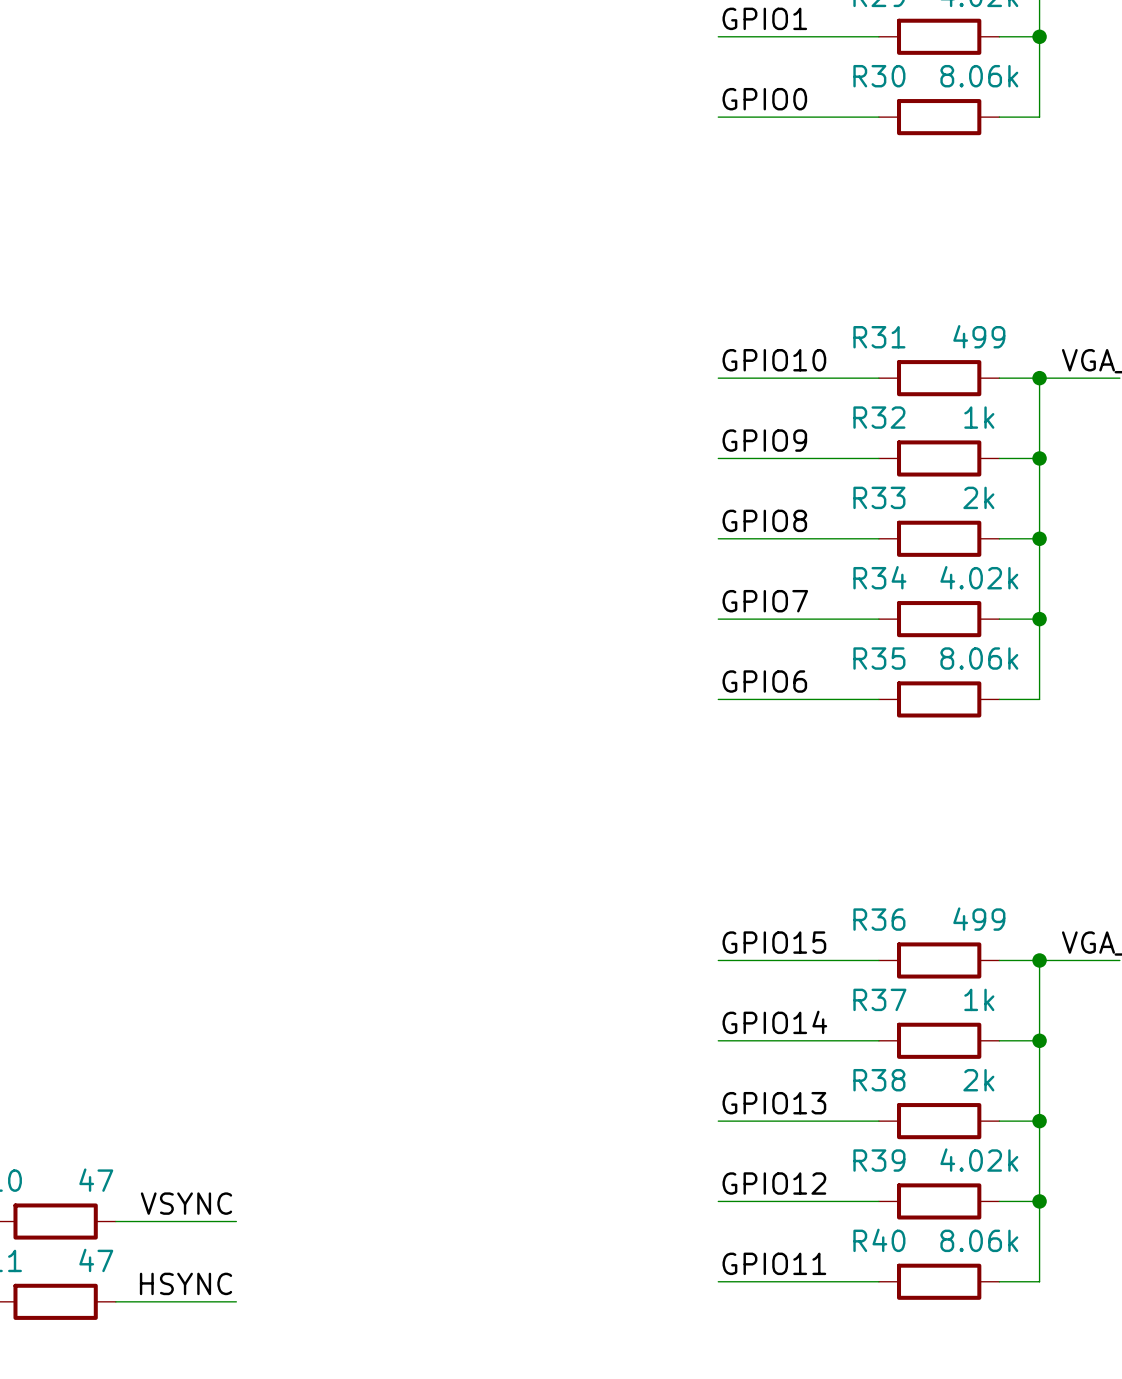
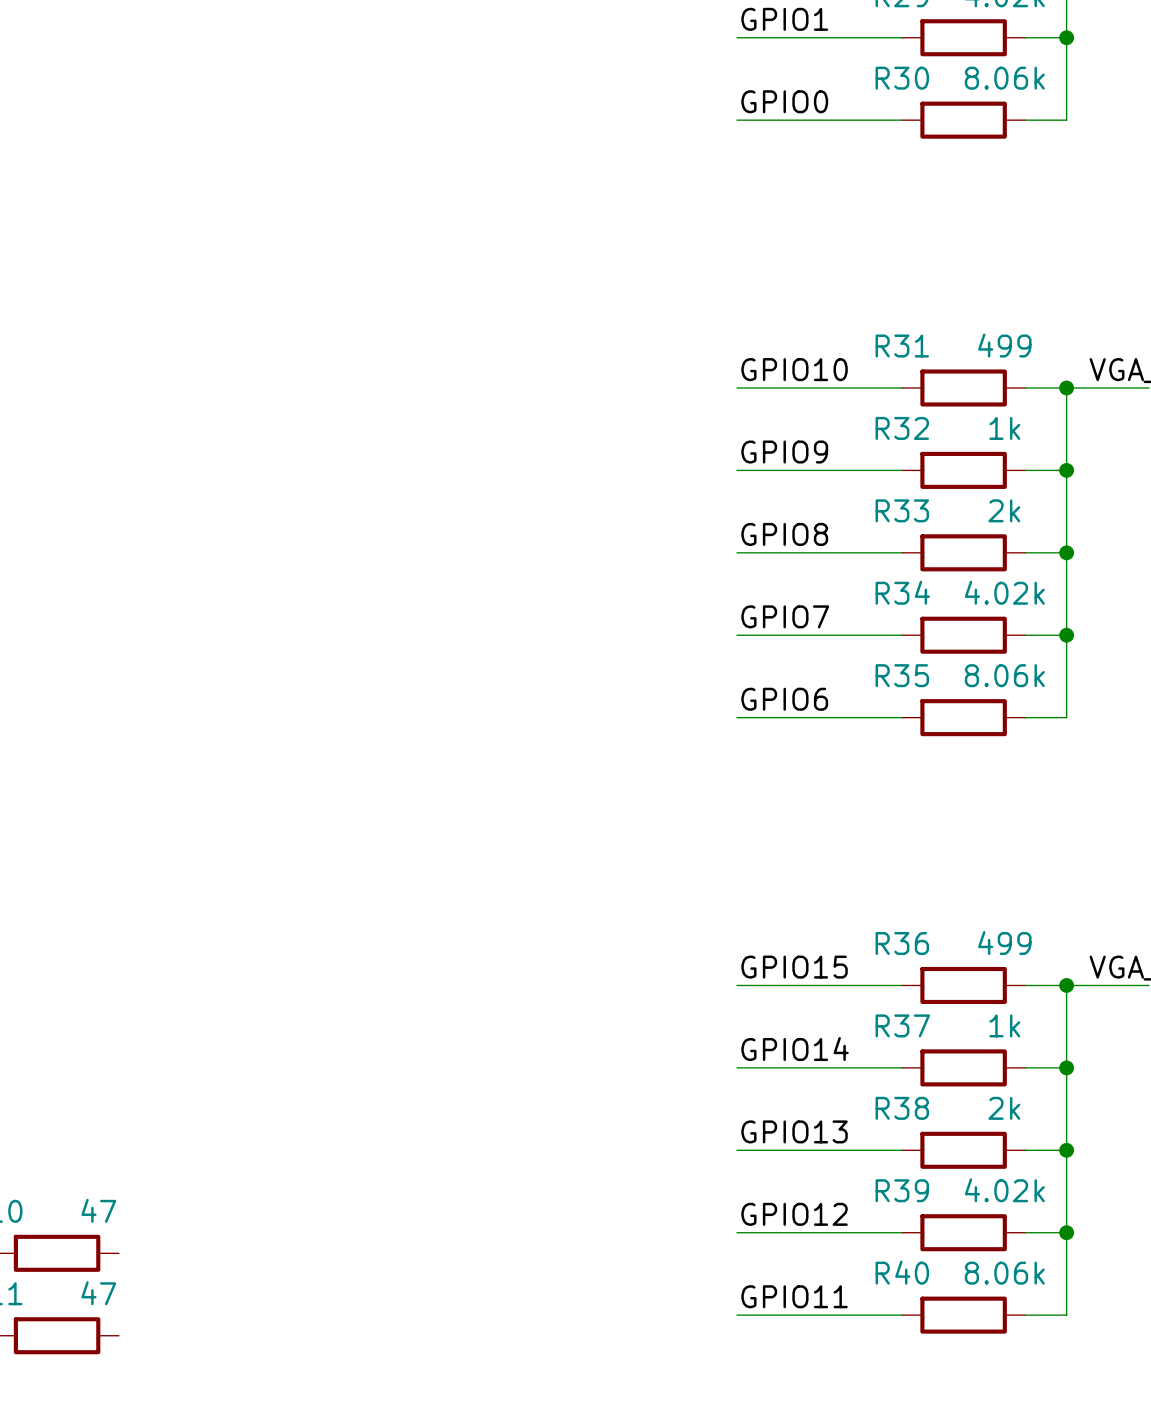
label: VSYNC (186, 1203) -> none
wire: (115, 1221) (236, 1221) -> none
label: HSYNC (186, 1283) -> none
wire: (115, 1301) (236, 1301) -> none

